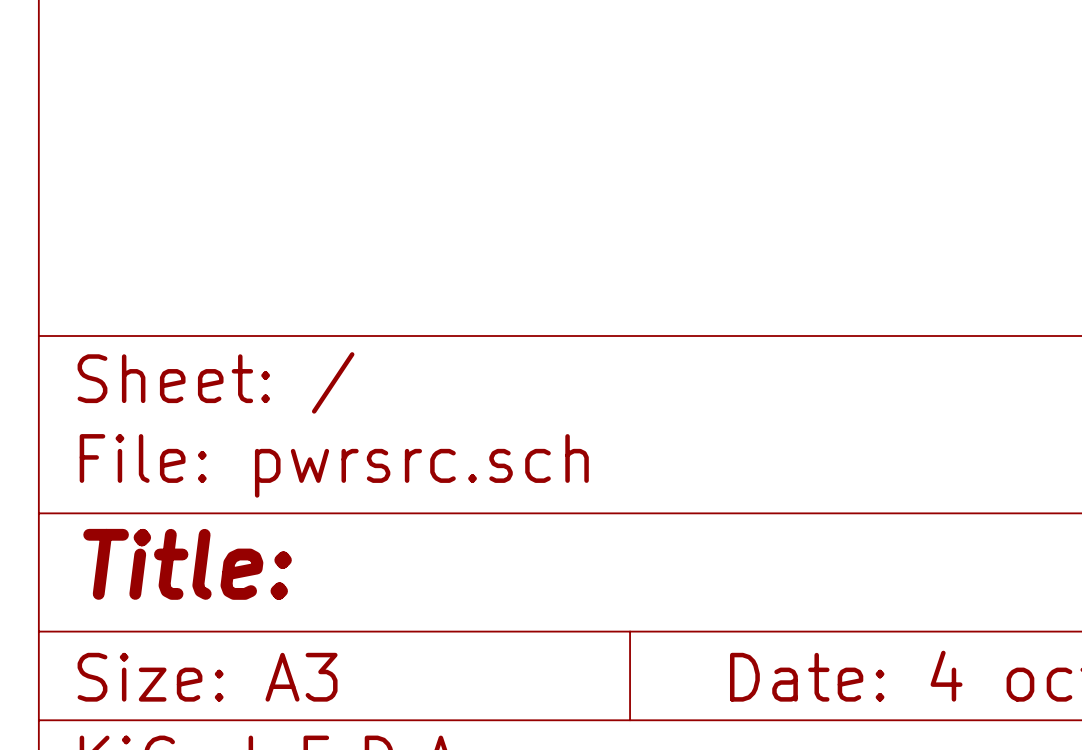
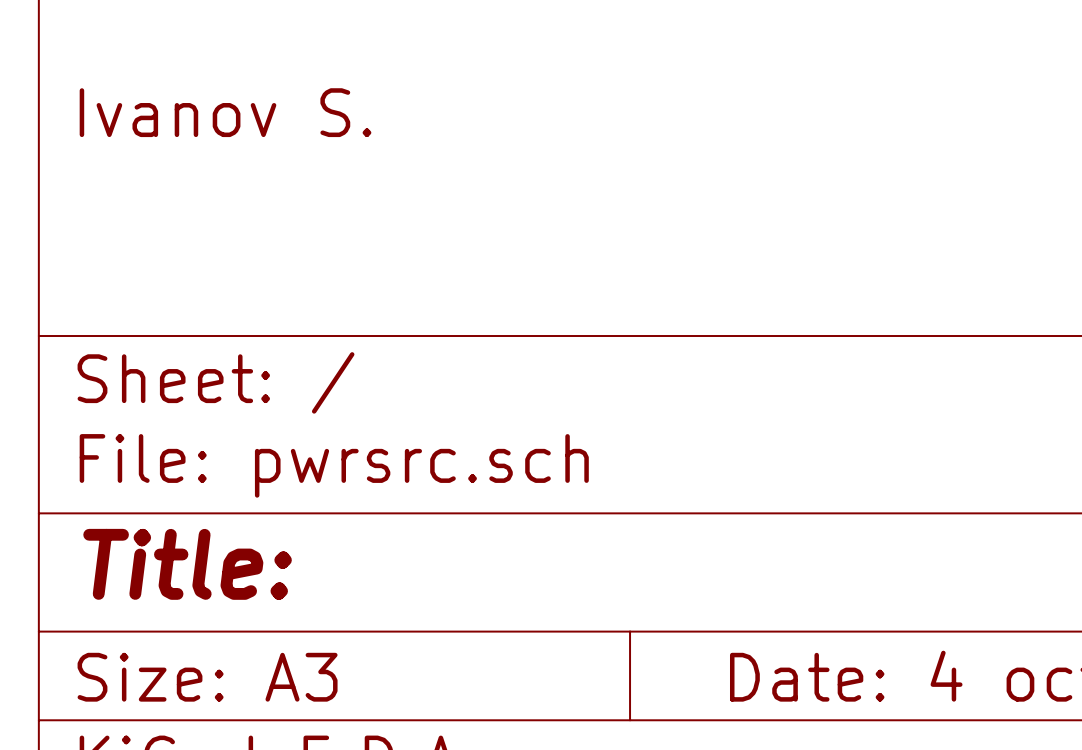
title block: none -> Ivanov S. (225, 112)

